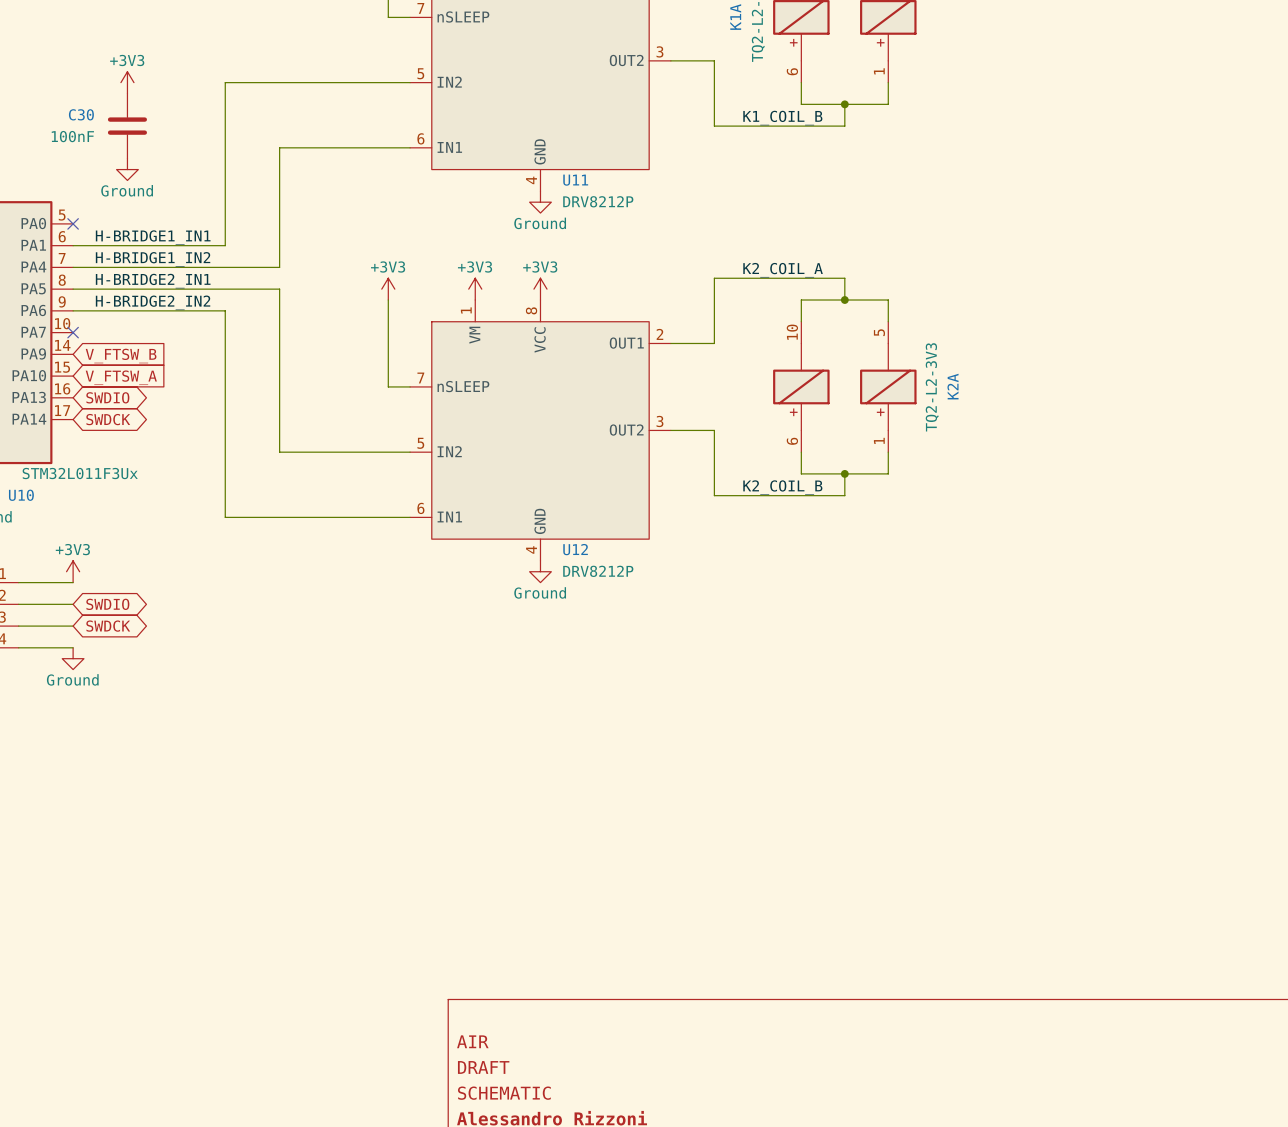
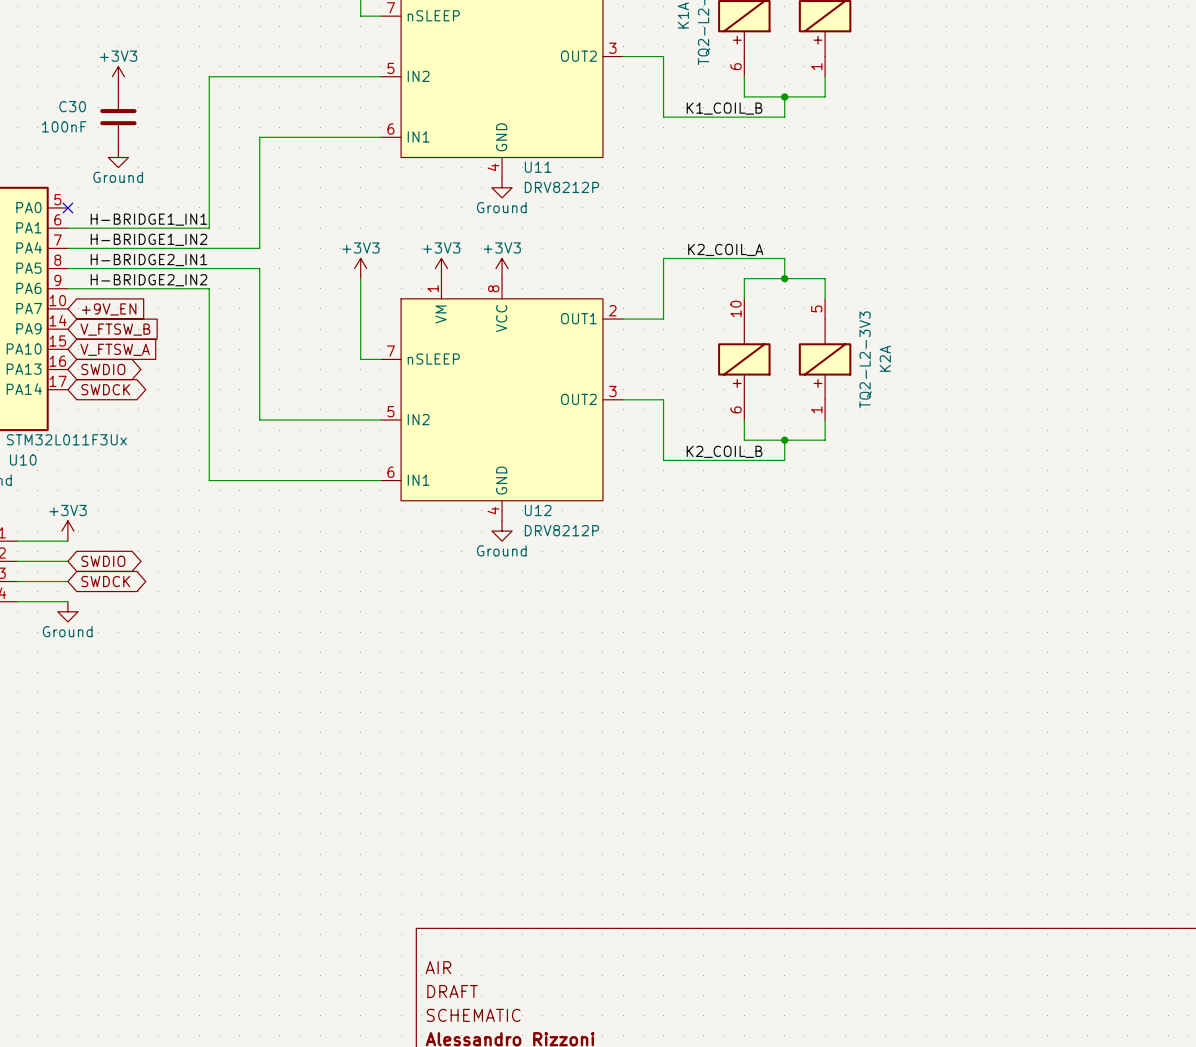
no-connect mark: (73, 332) -> none
global label: none -> +9V_EN (109, 309)

